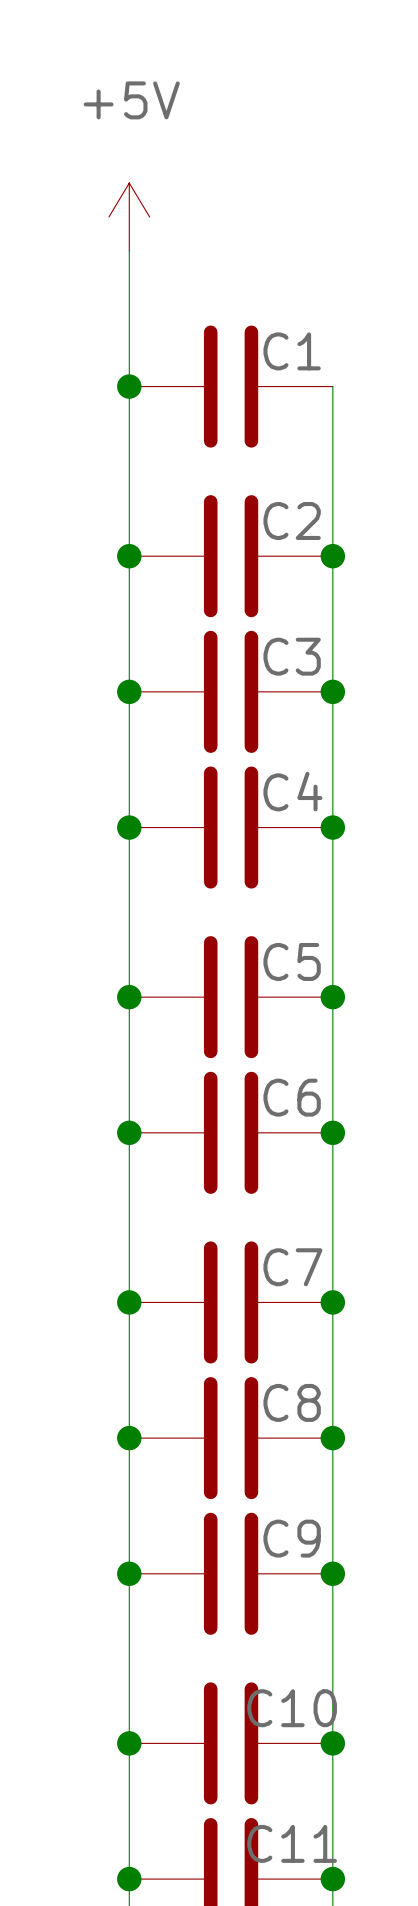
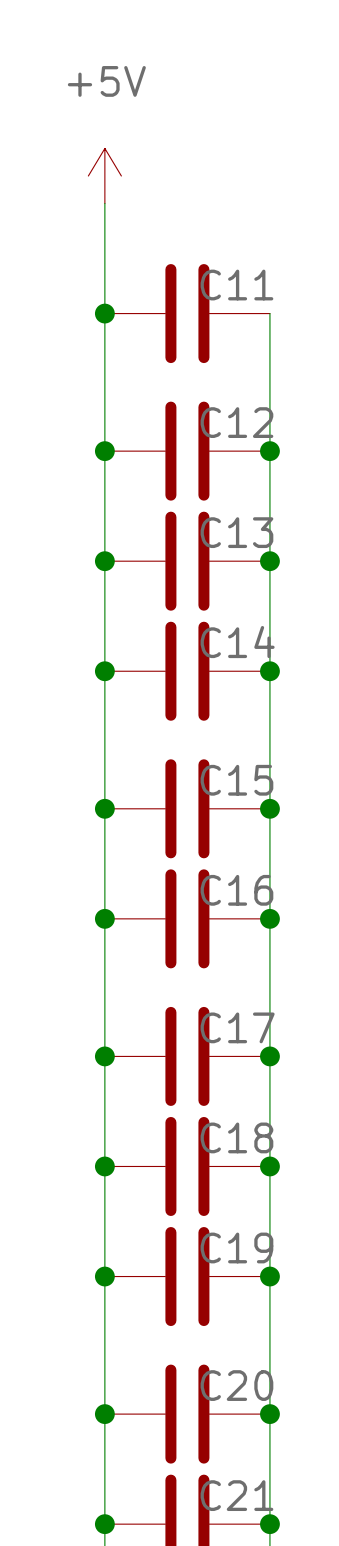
C1 name: C1 (292, 351) -> C11 (236, 285)
C2 name: C2 (292, 521) -> C12 (236, 422)
C3 name: C3 (292, 656) -> C13 (236, 532)
C4 name: C4 (292, 791) -> C14 (237, 642)
C5 name: C5 (292, 961) -> C15 (236, 780)
C6 name: C6 (292, 1097) -> C16 (236, 890)
C7 name: C7 (292, 1267) -> C17 (237, 1027)
C8 name: C8 (292, 1402) -> C18 (236, 1137)
C9 name: C9 (292, 1538) -> C19 (236, 1247)
C10 name: C10 (292, 1708) -> C20 (236, 1385)
C11 name: C11 (292, 1843) -> C21 (236, 1495)

